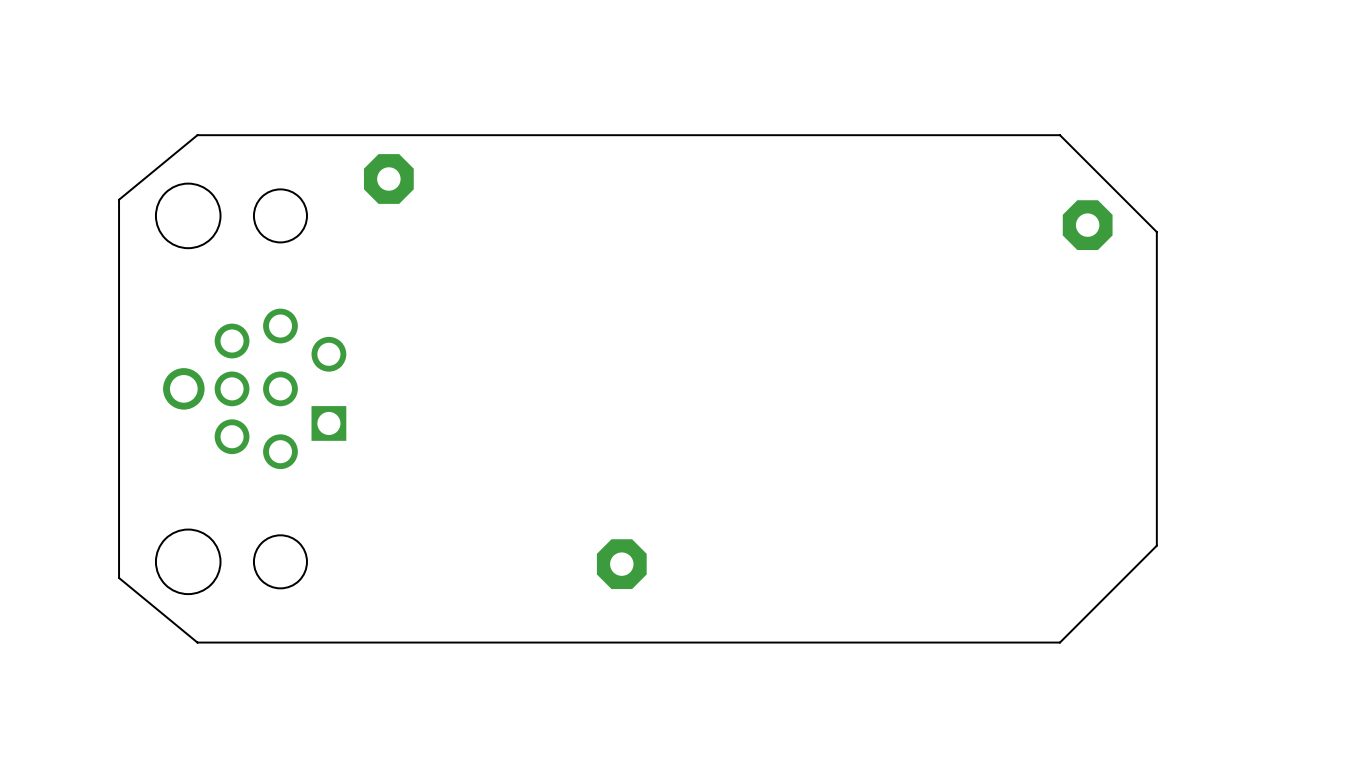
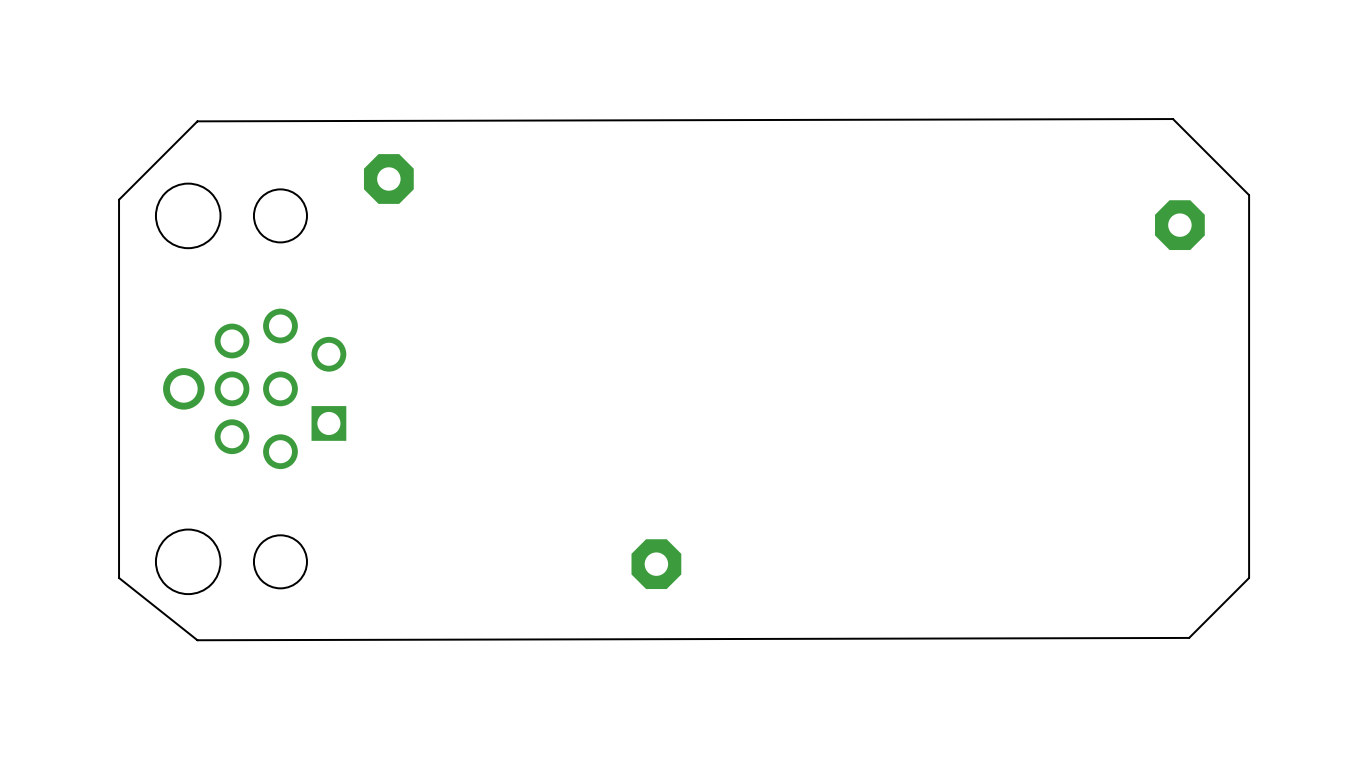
board edge: (119, 199) (197, 135) (1059, 135) (1156, 232) (1156, 545) (1059, 642) (197, 642) (119, 577) -> (119, 199) (197, 121) (1172, 119) (1249, 195) (1249, 577) (1189, 637) (197, 640) (119, 577)
part position: (1087, 225) -> (1179, 225)
part position: (621, 564) -> (656, 564)

